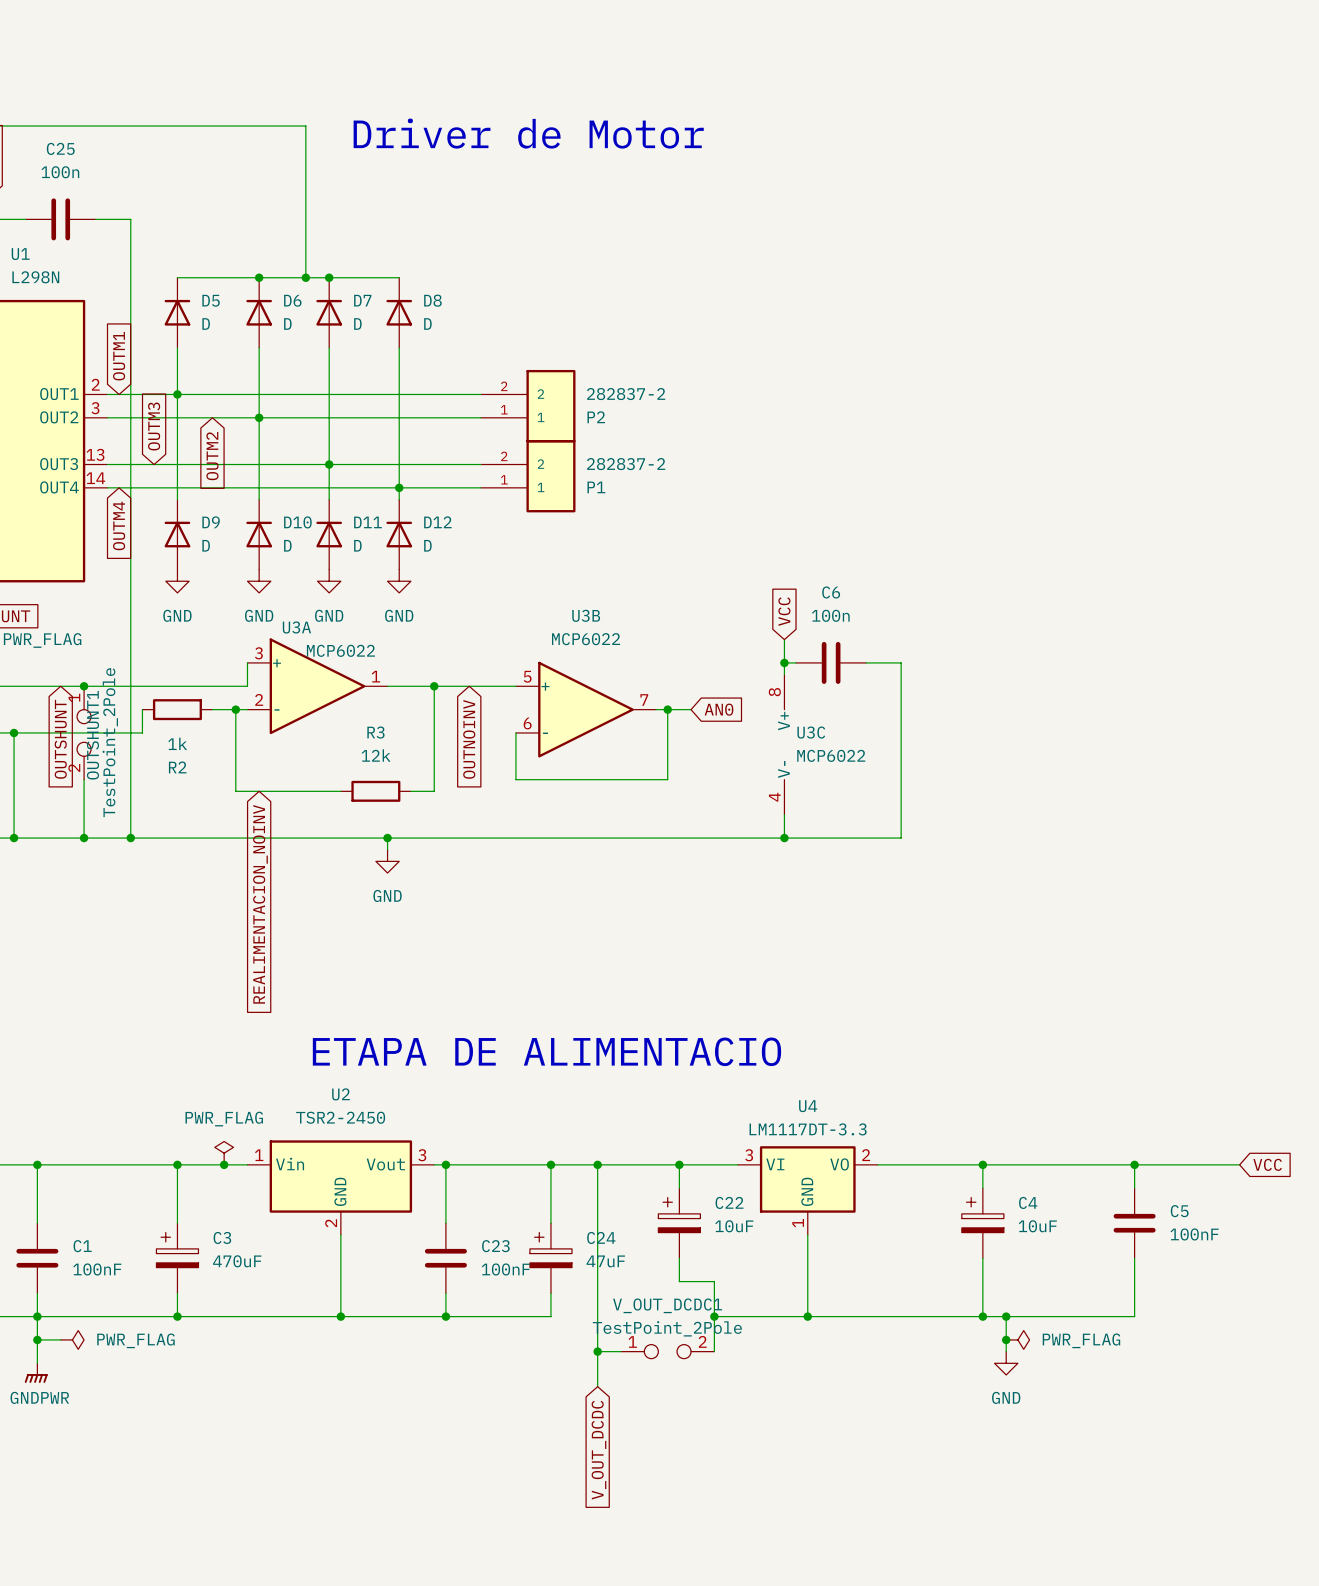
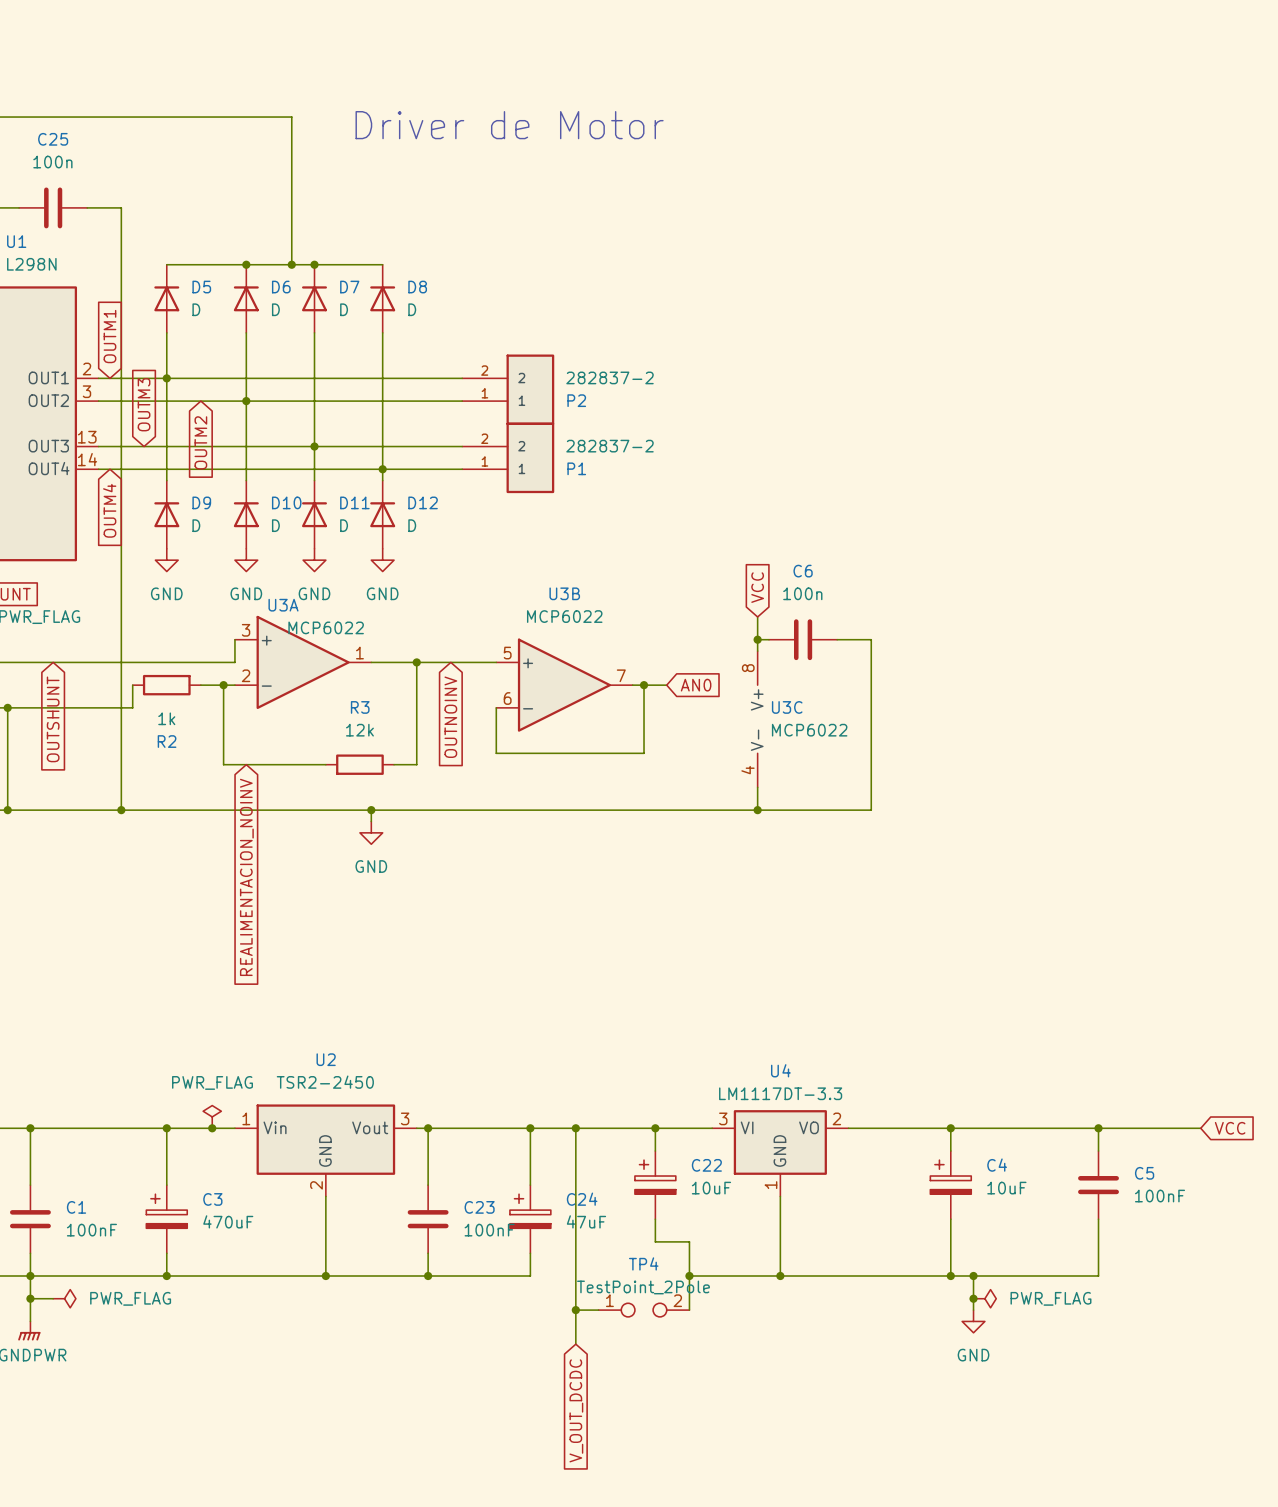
junction: (84, 686) -> none
OUTSHUNT1: TestPoint_2Pole (84, 732) -> none
wire: (84, 779) (84, 838) -> none
junction: (84, 838) -> none
text: ETAPA DE ALIMENTACIO (546, 1051) -> none
V_OUT_DCDC1 name: V_OUT_DCDC1 (667, 1305) -> TP4 (643, 1263)

